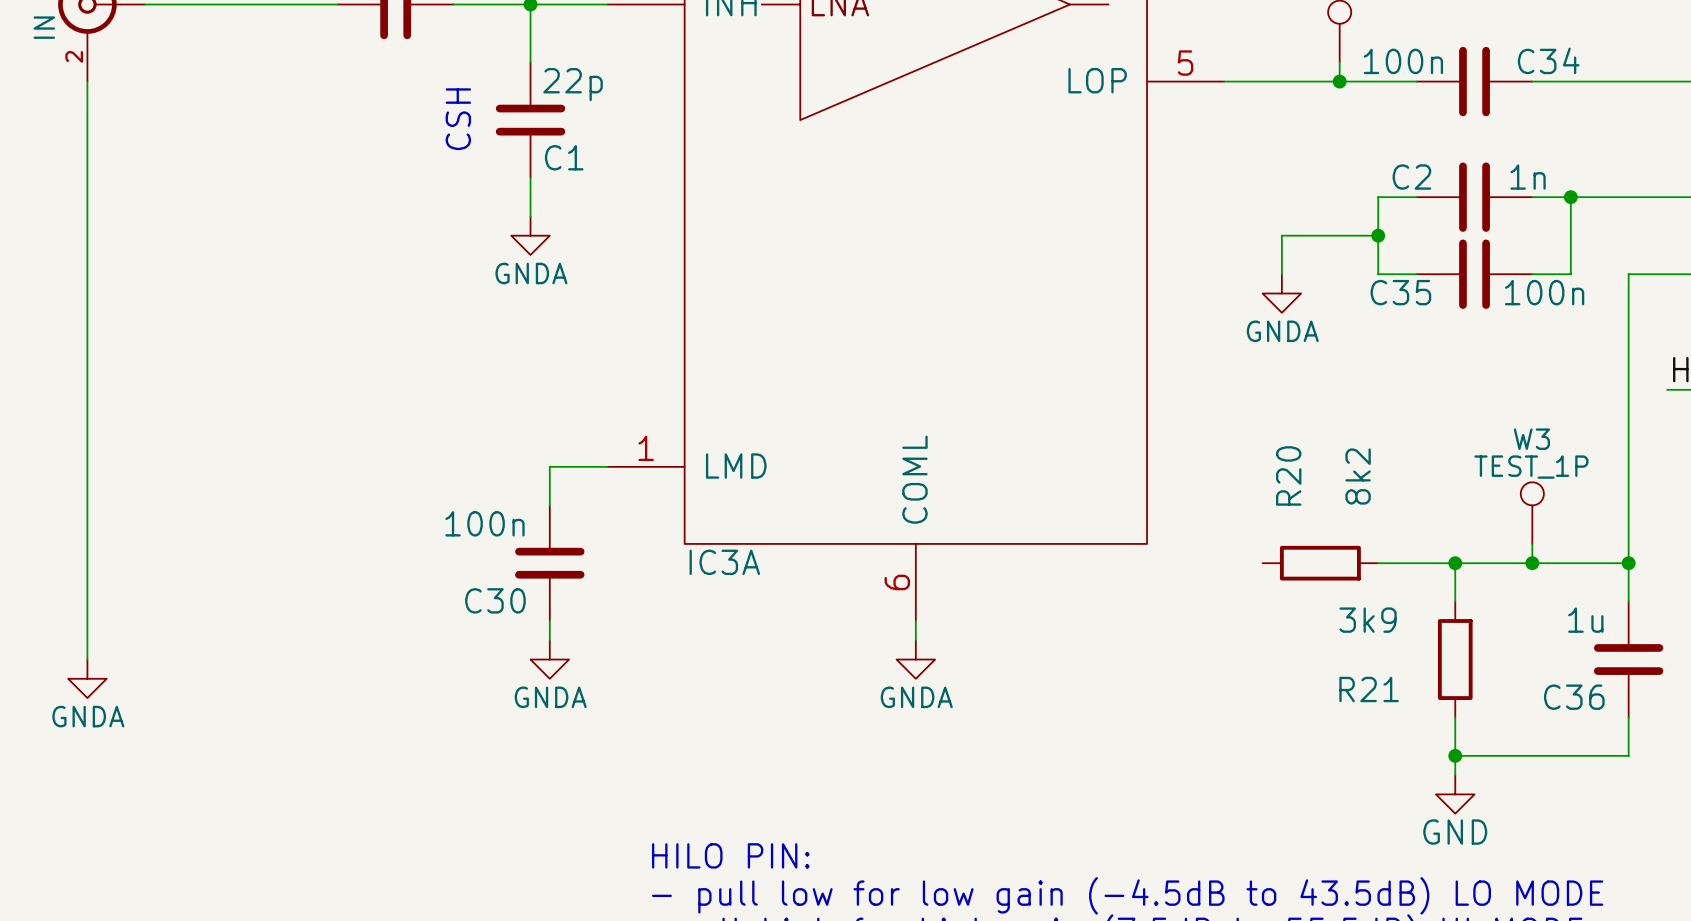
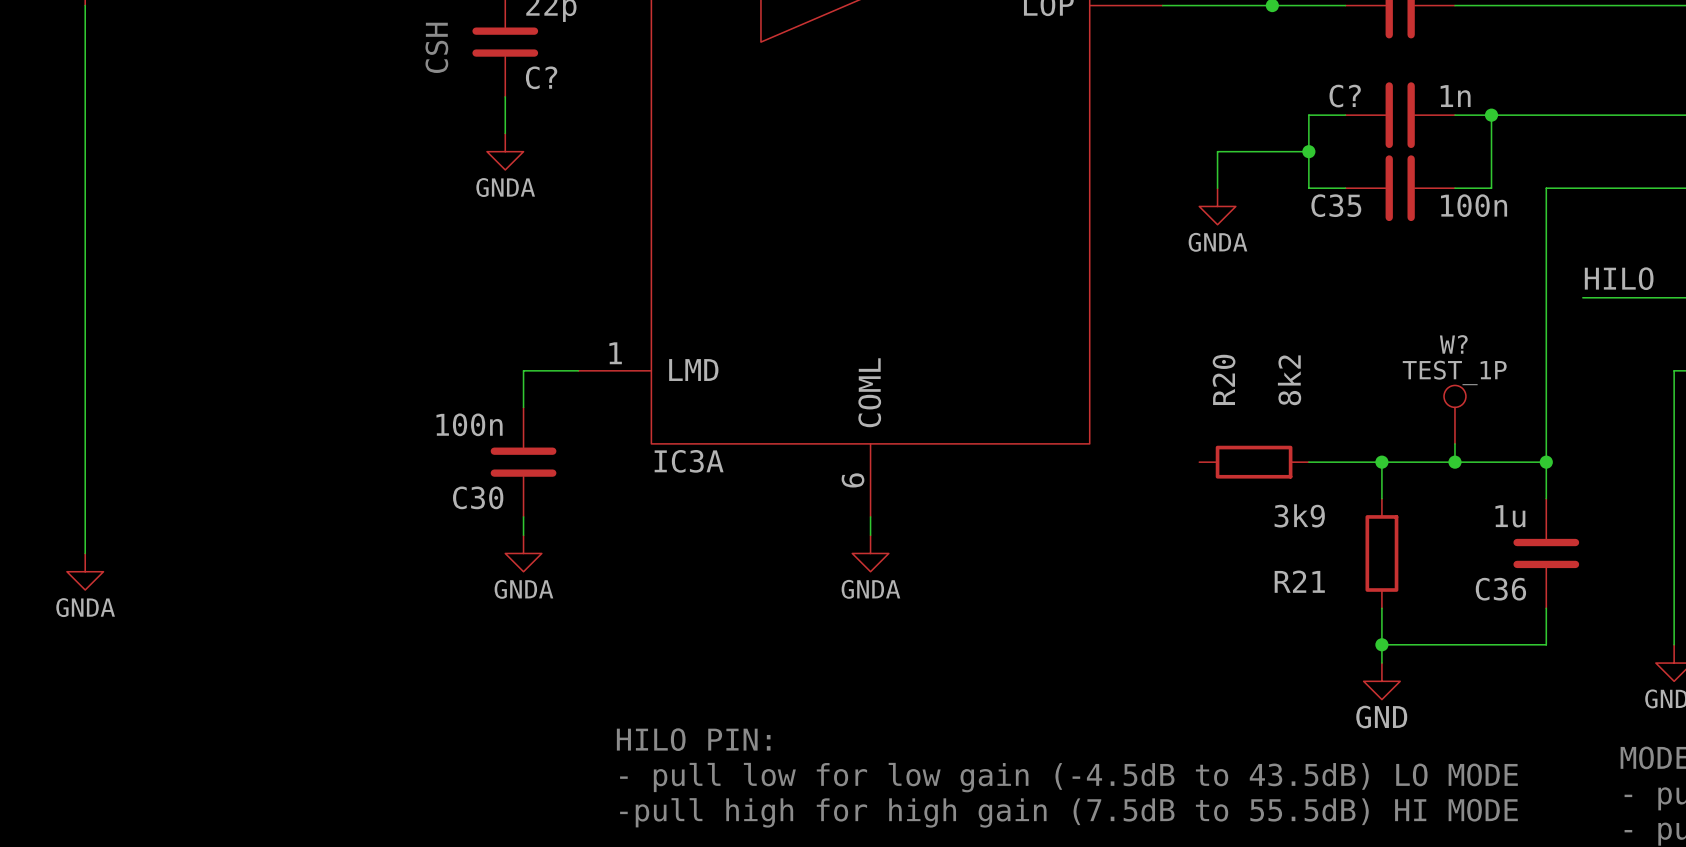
C1 name: C1 (564, 157) -> C? (541, 77)
C2 name: C2 (1411, 177) -> C? (1345, 96)
W3 name: W3 (1531, 439) -> W? (1453, 344)

